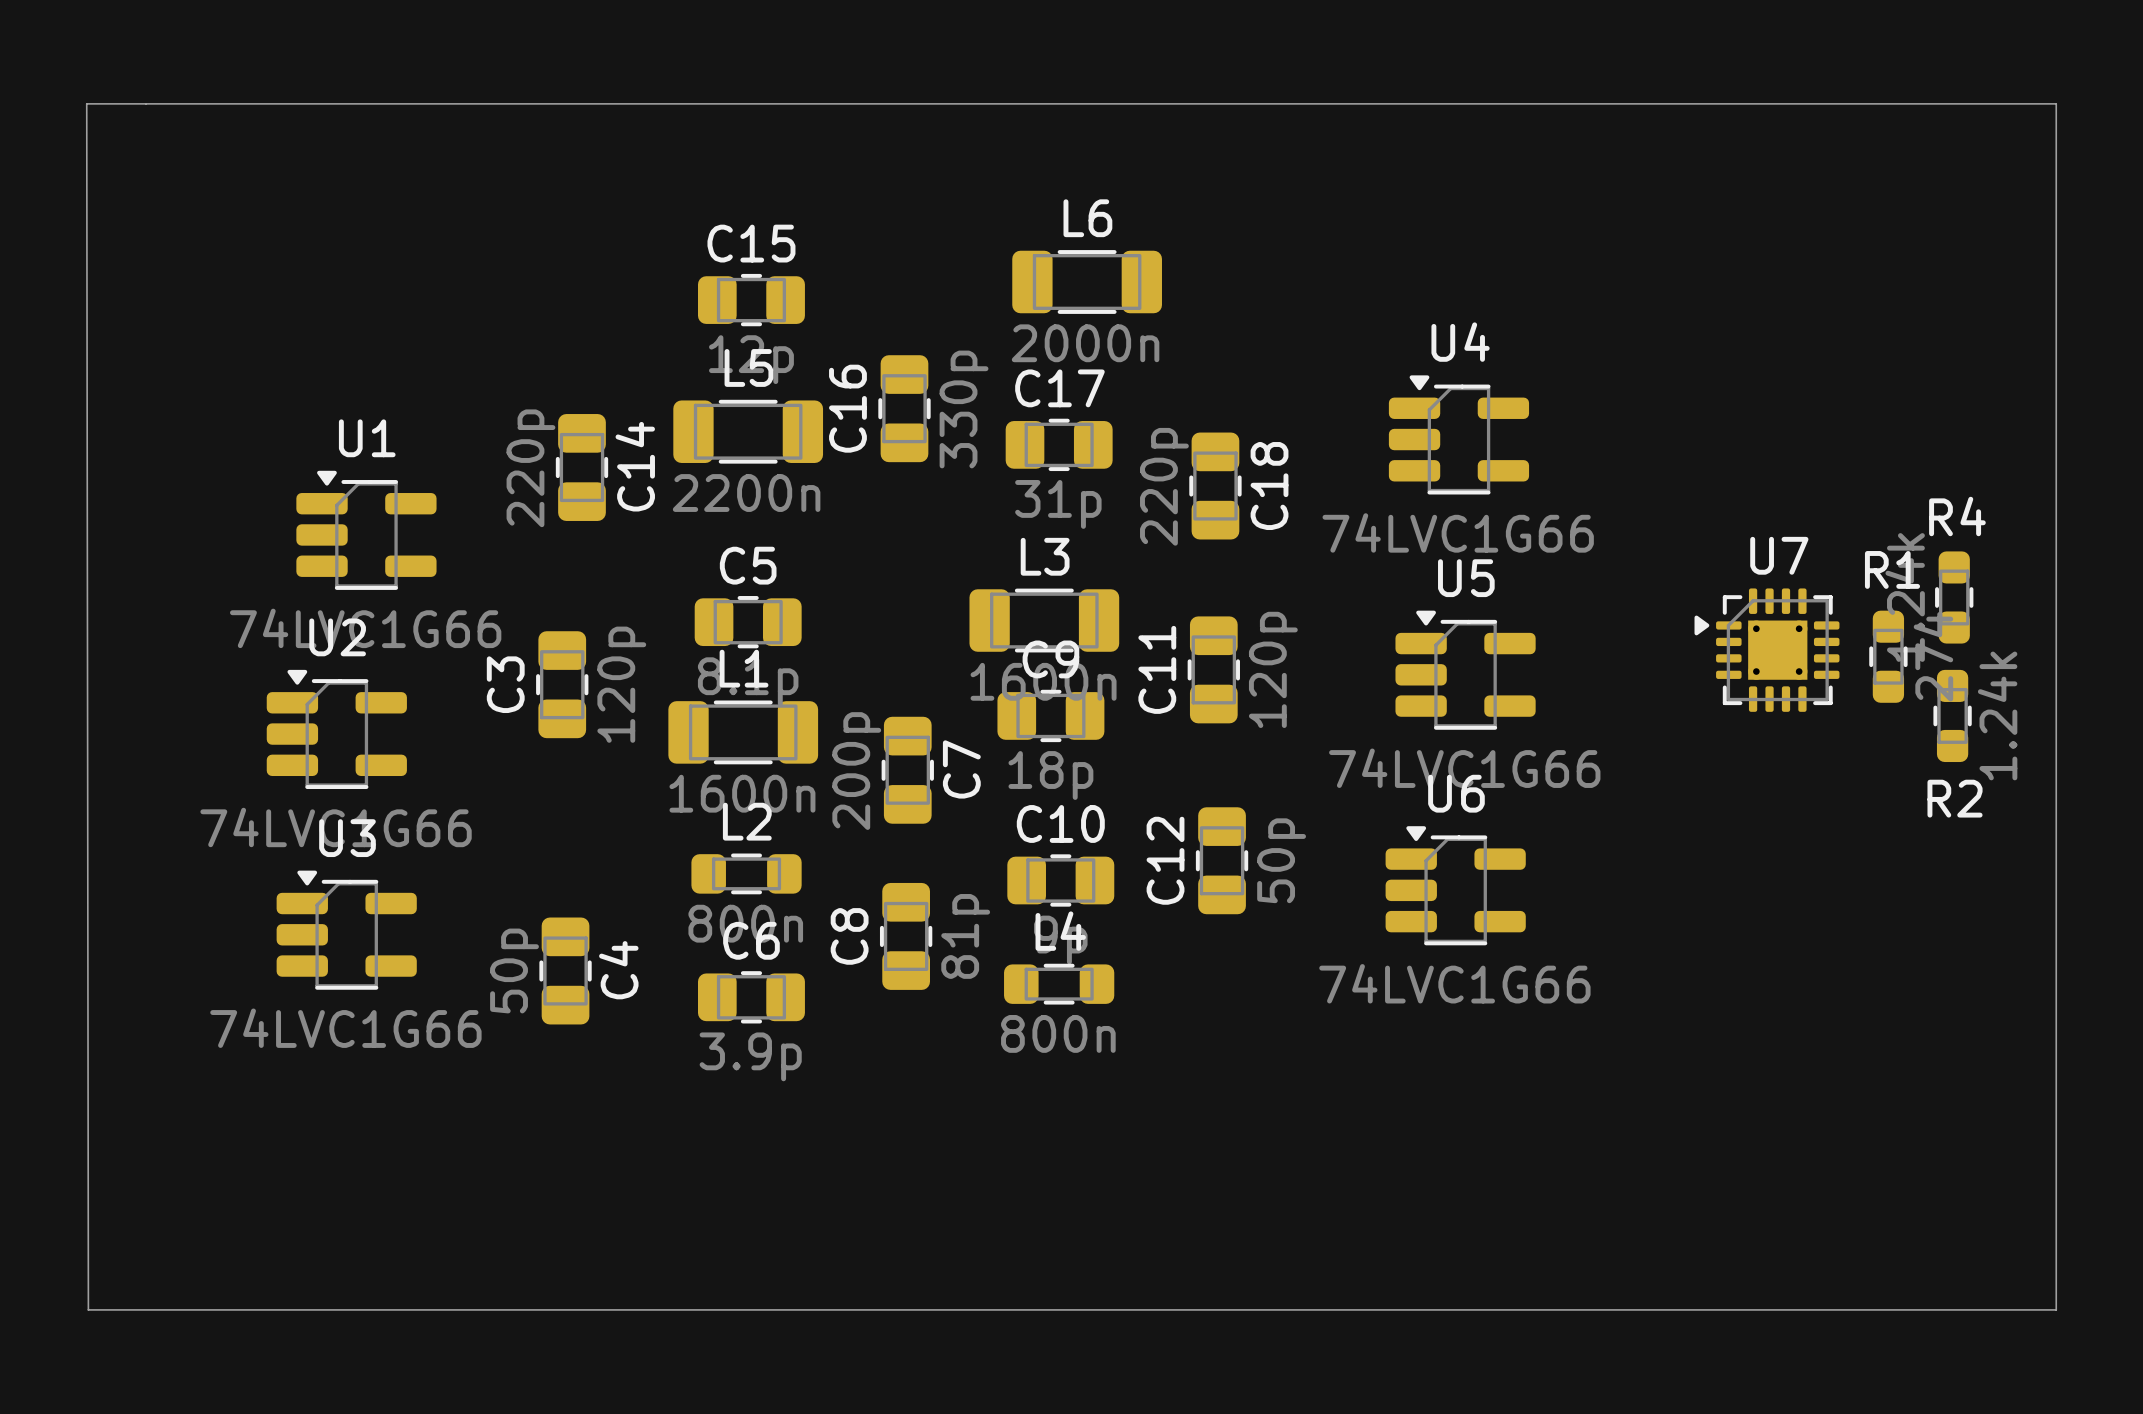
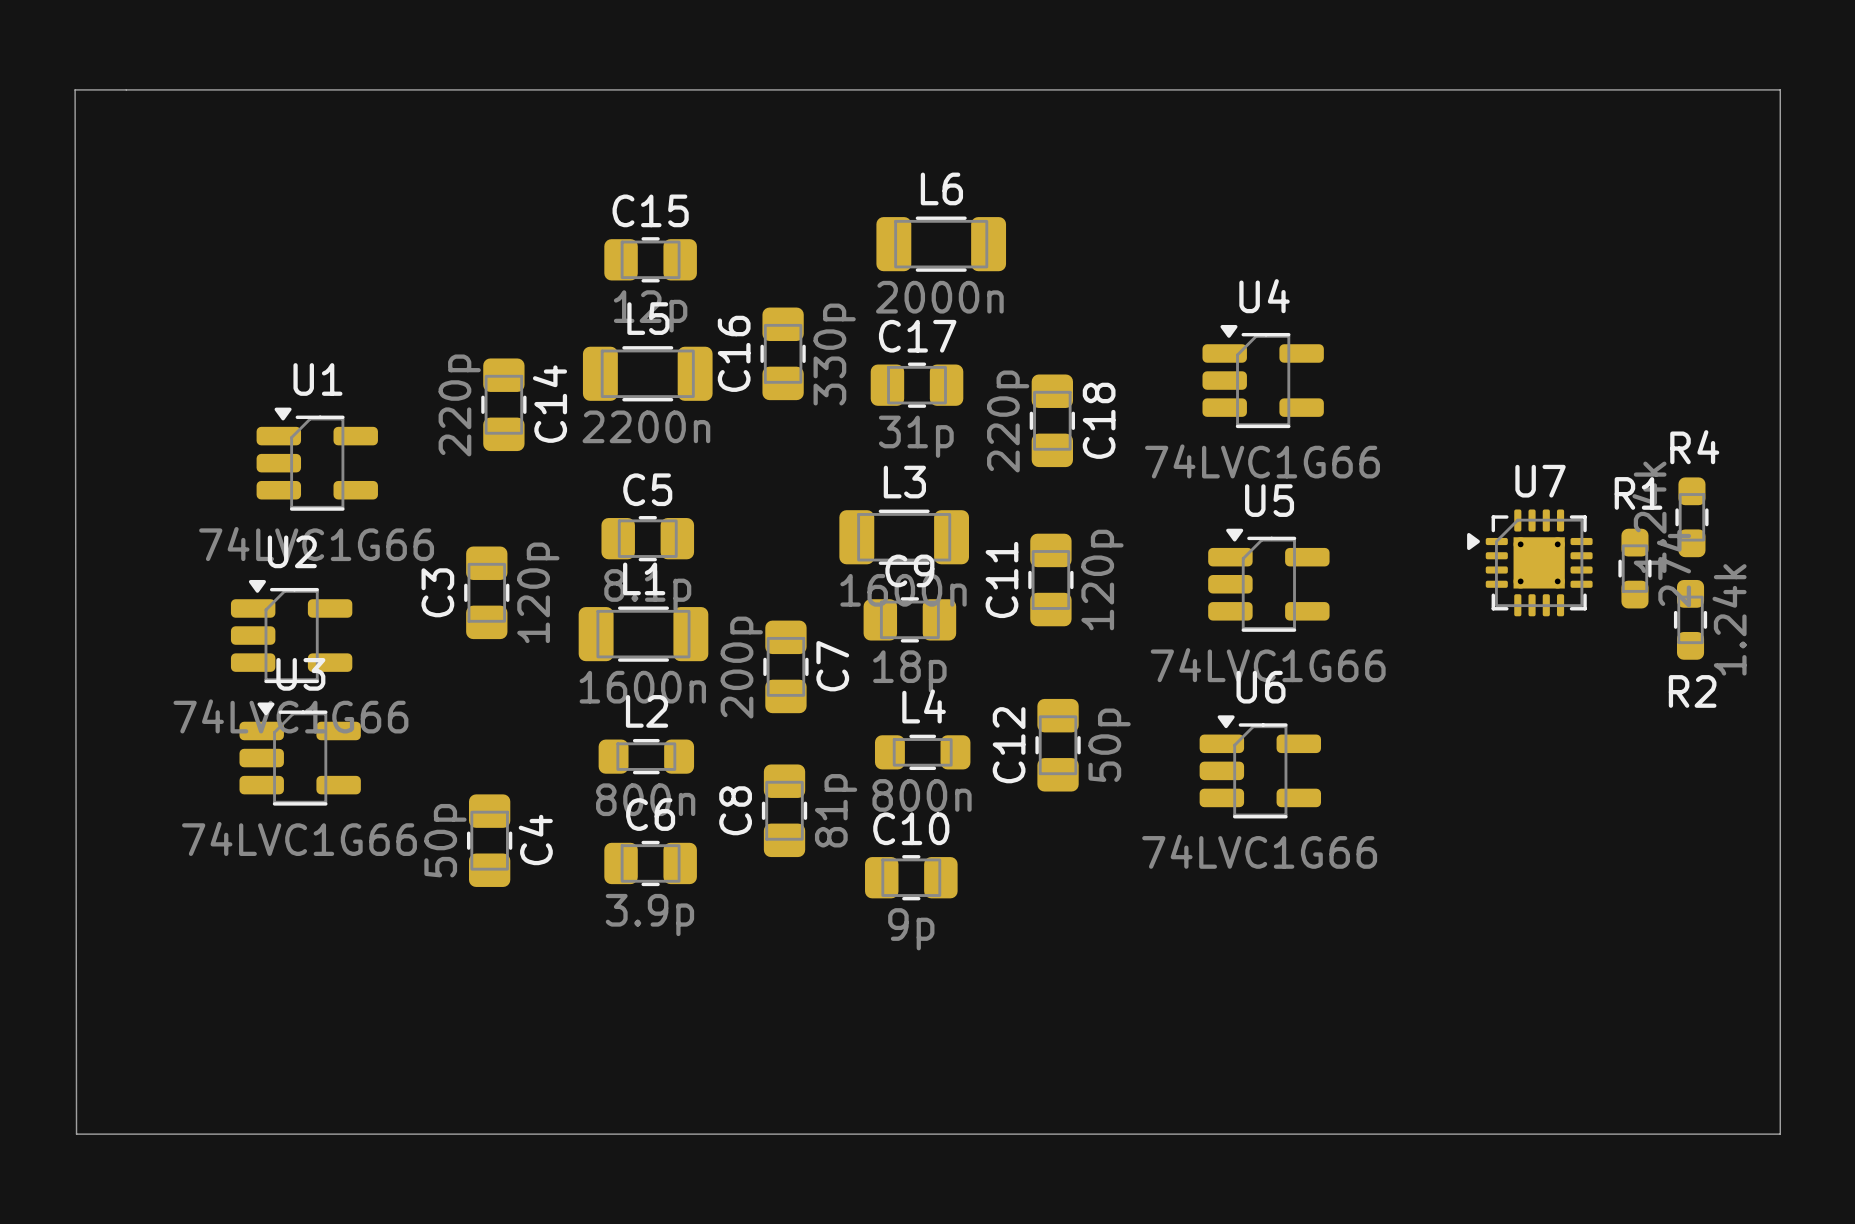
C10 position: (1060, 880) -> (911, 877)
U3 position: (346, 930) -> (300, 754)
L4 position: (1059, 984) -> (922, 752)

